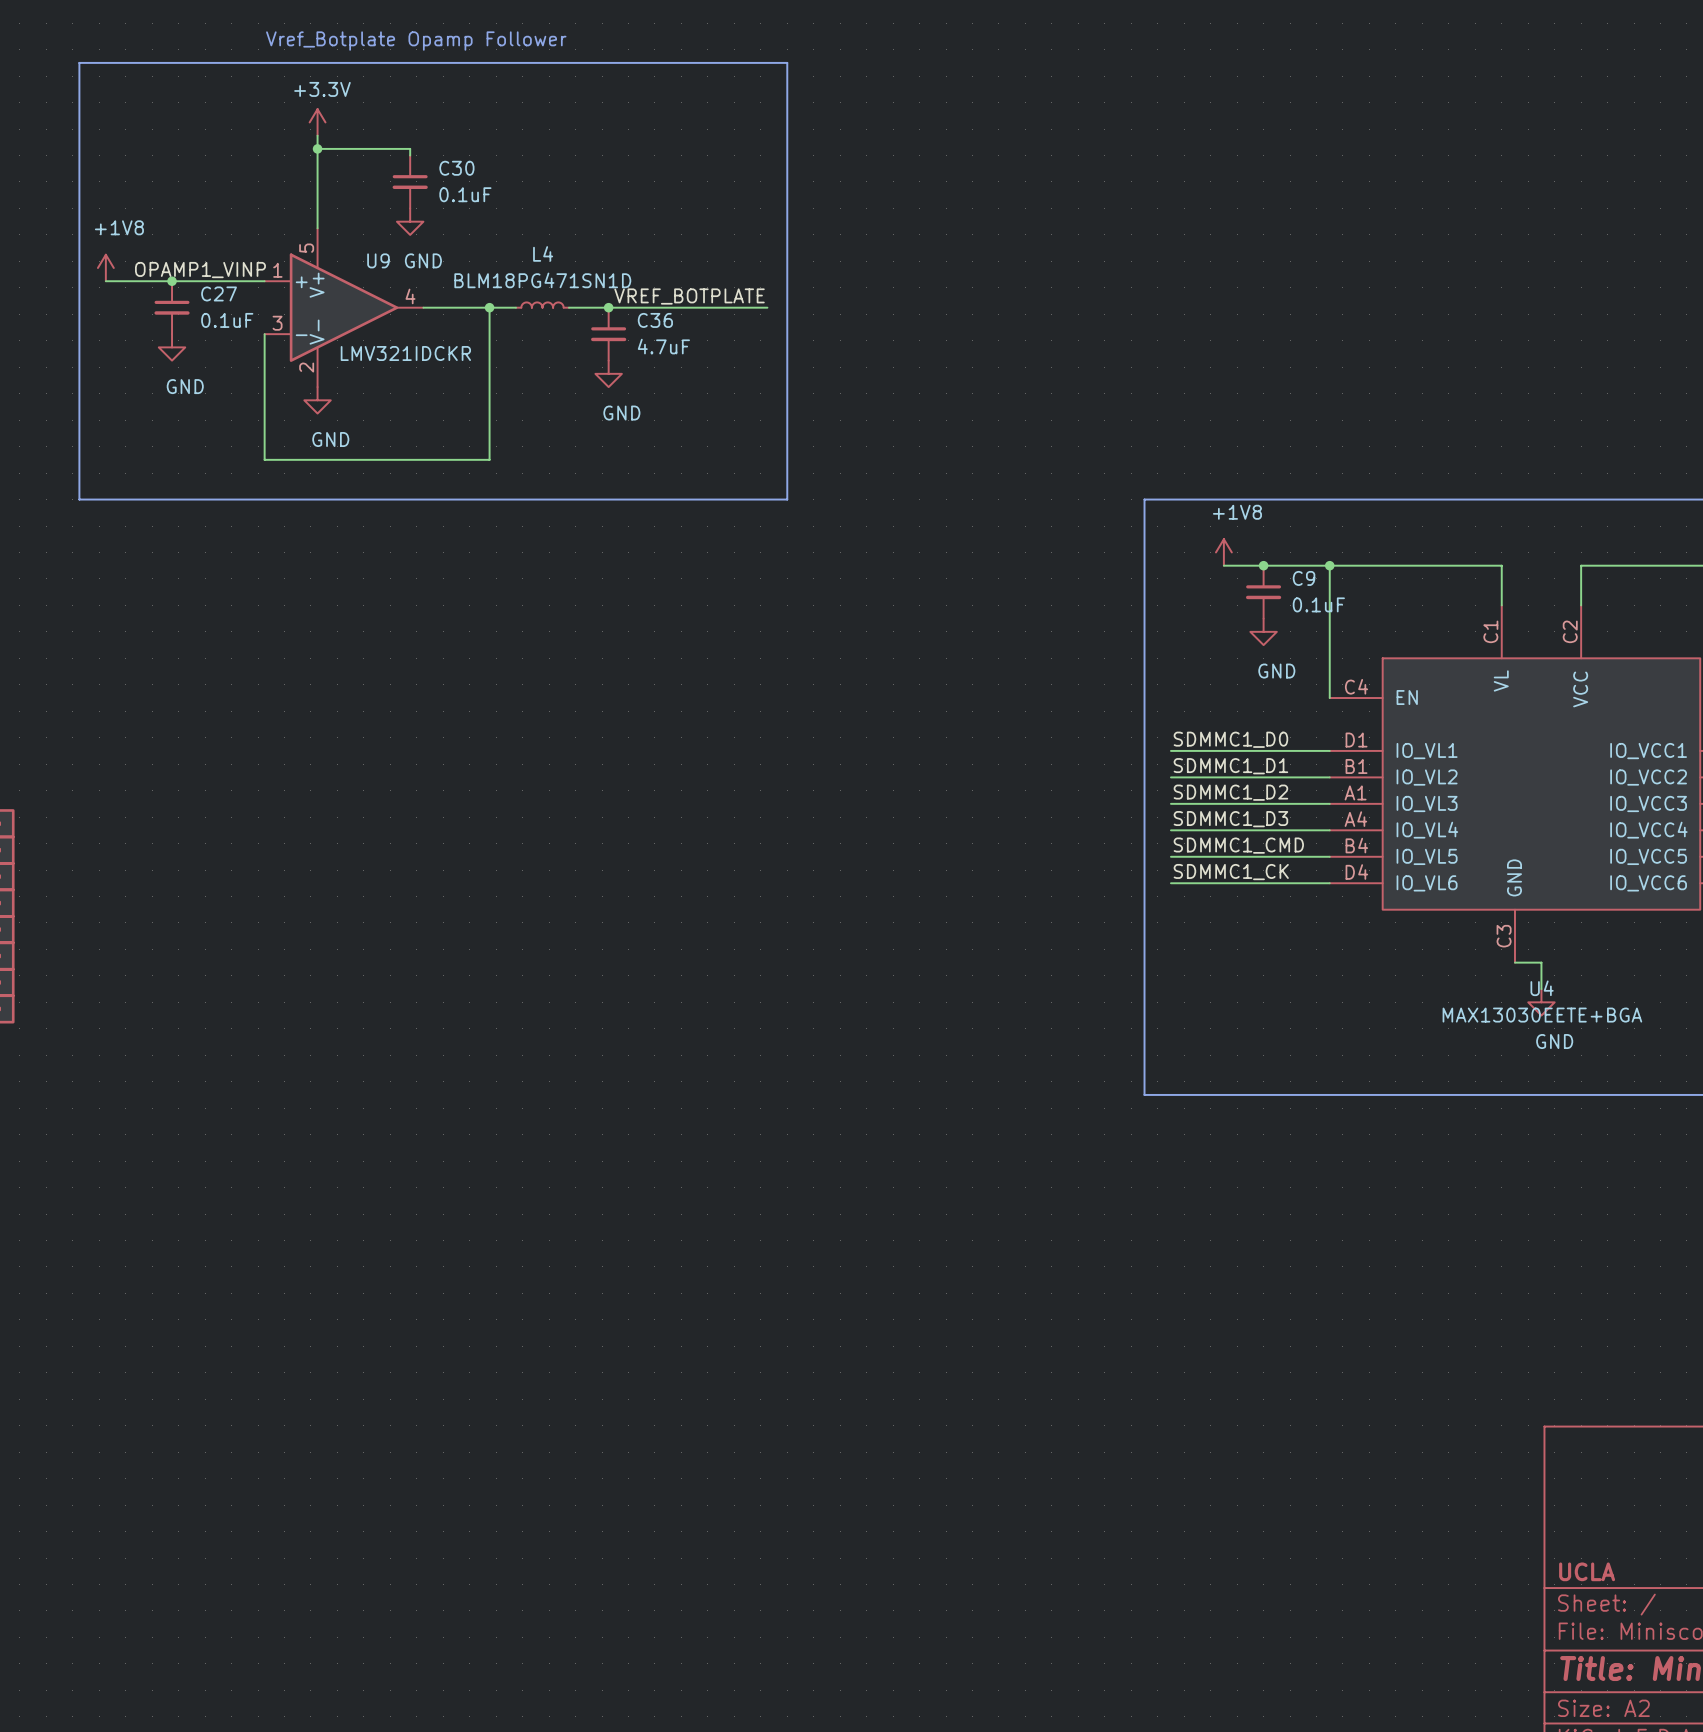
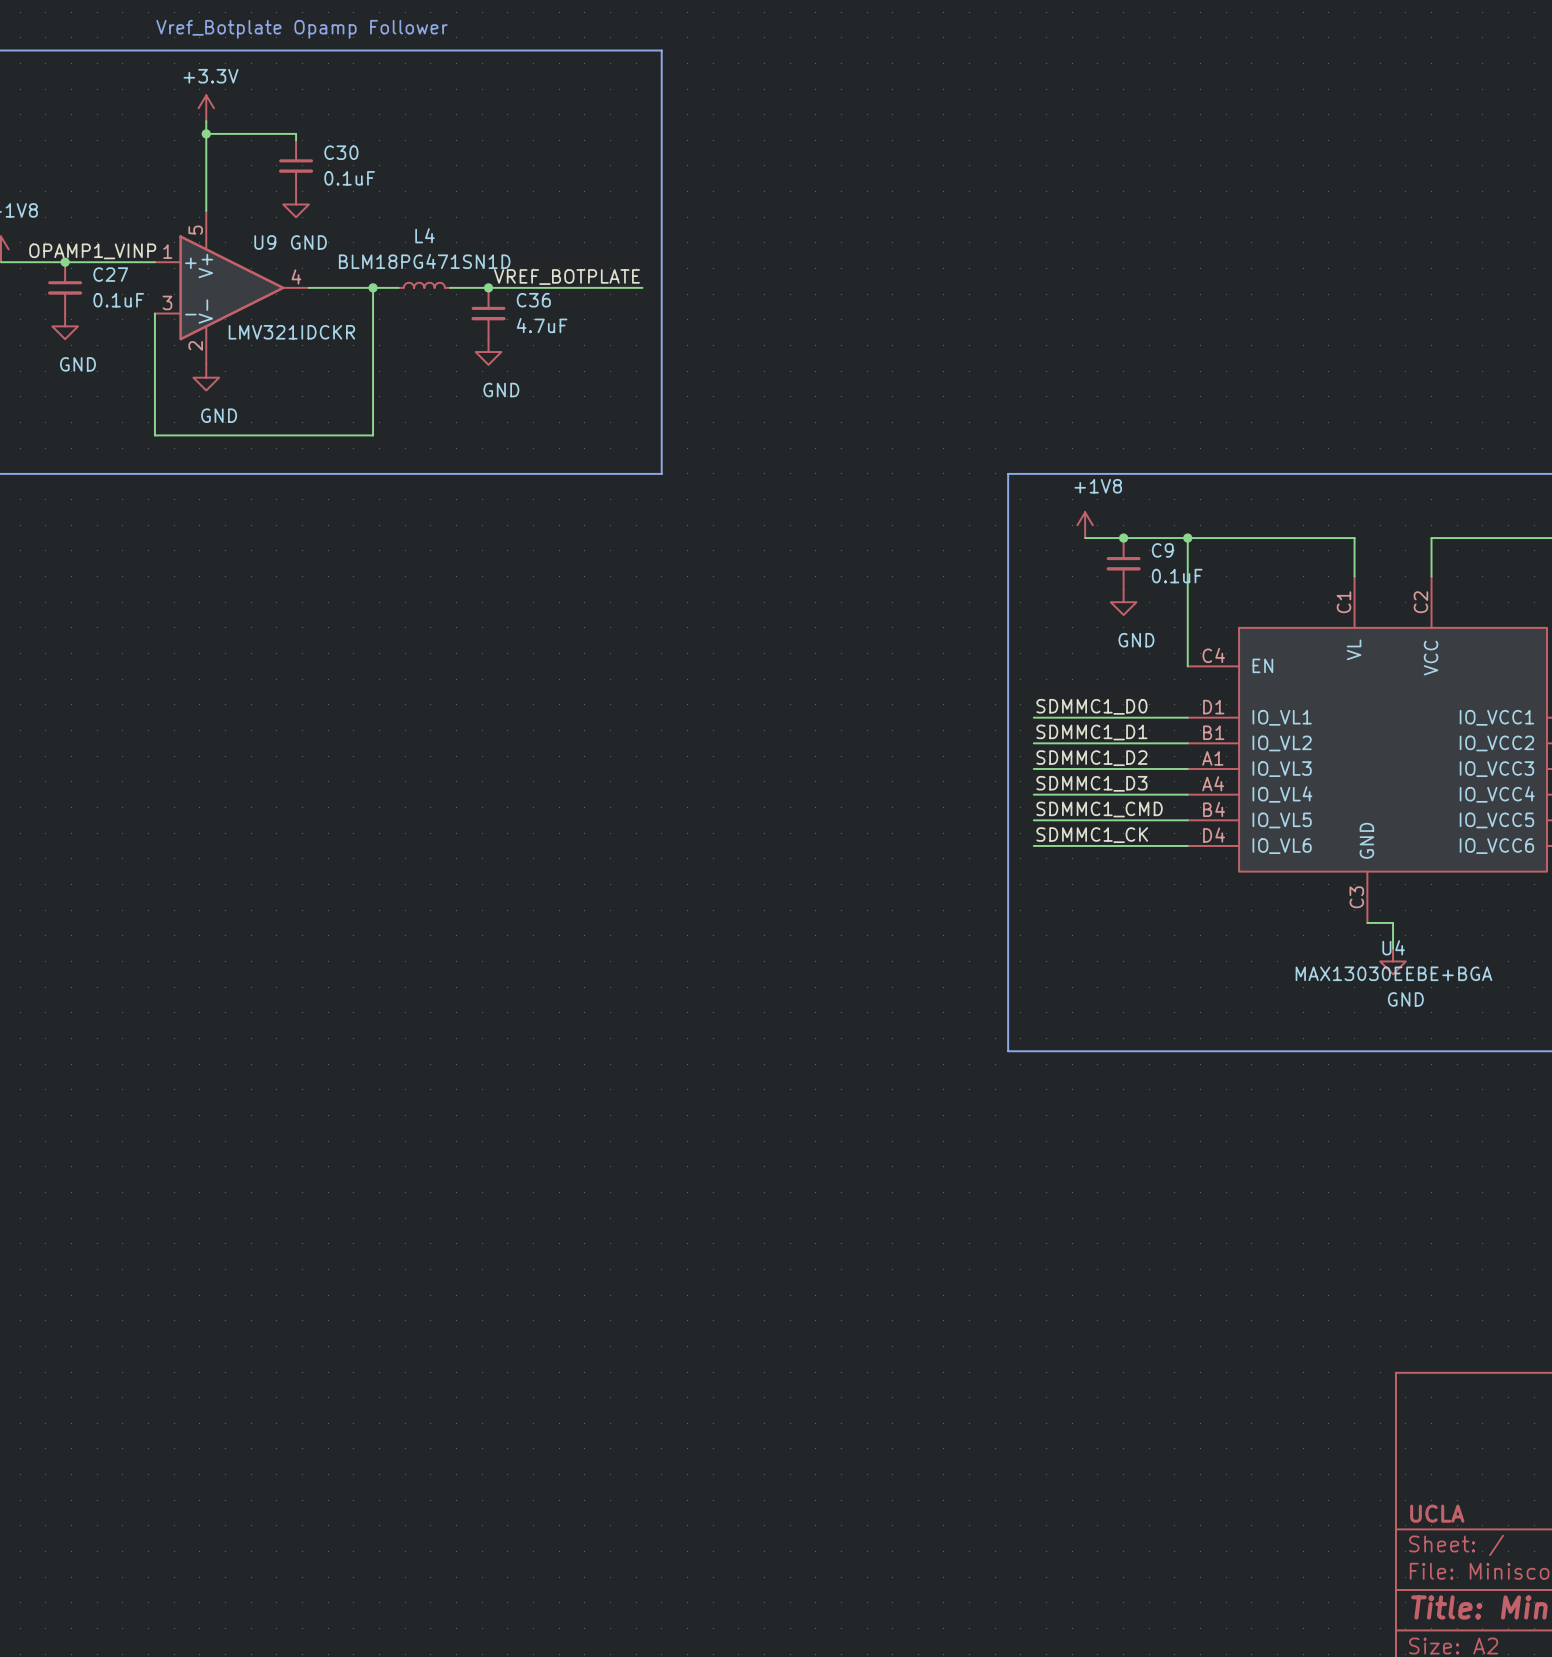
U4 value: MAX13030EETE+BGA (1542, 1015) -> MAX13030EEBE+BGA (1393, 973)

